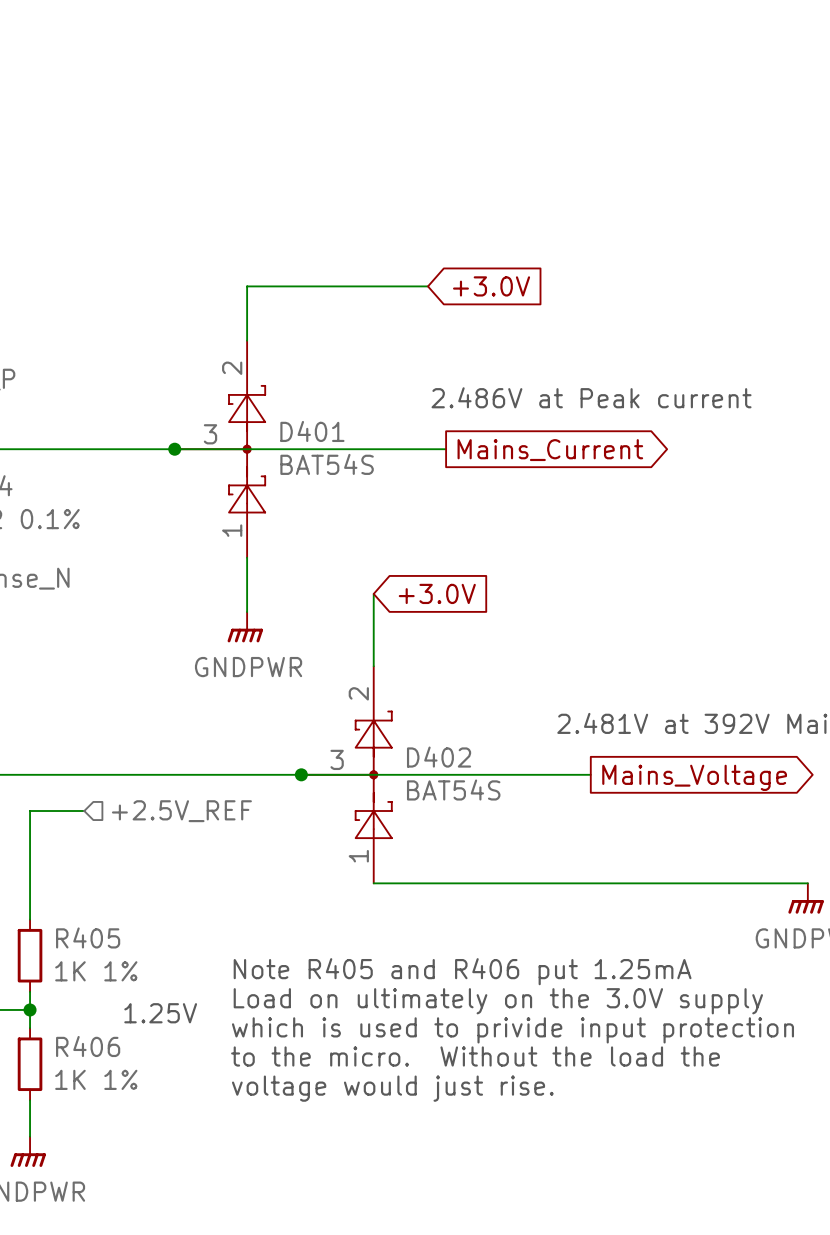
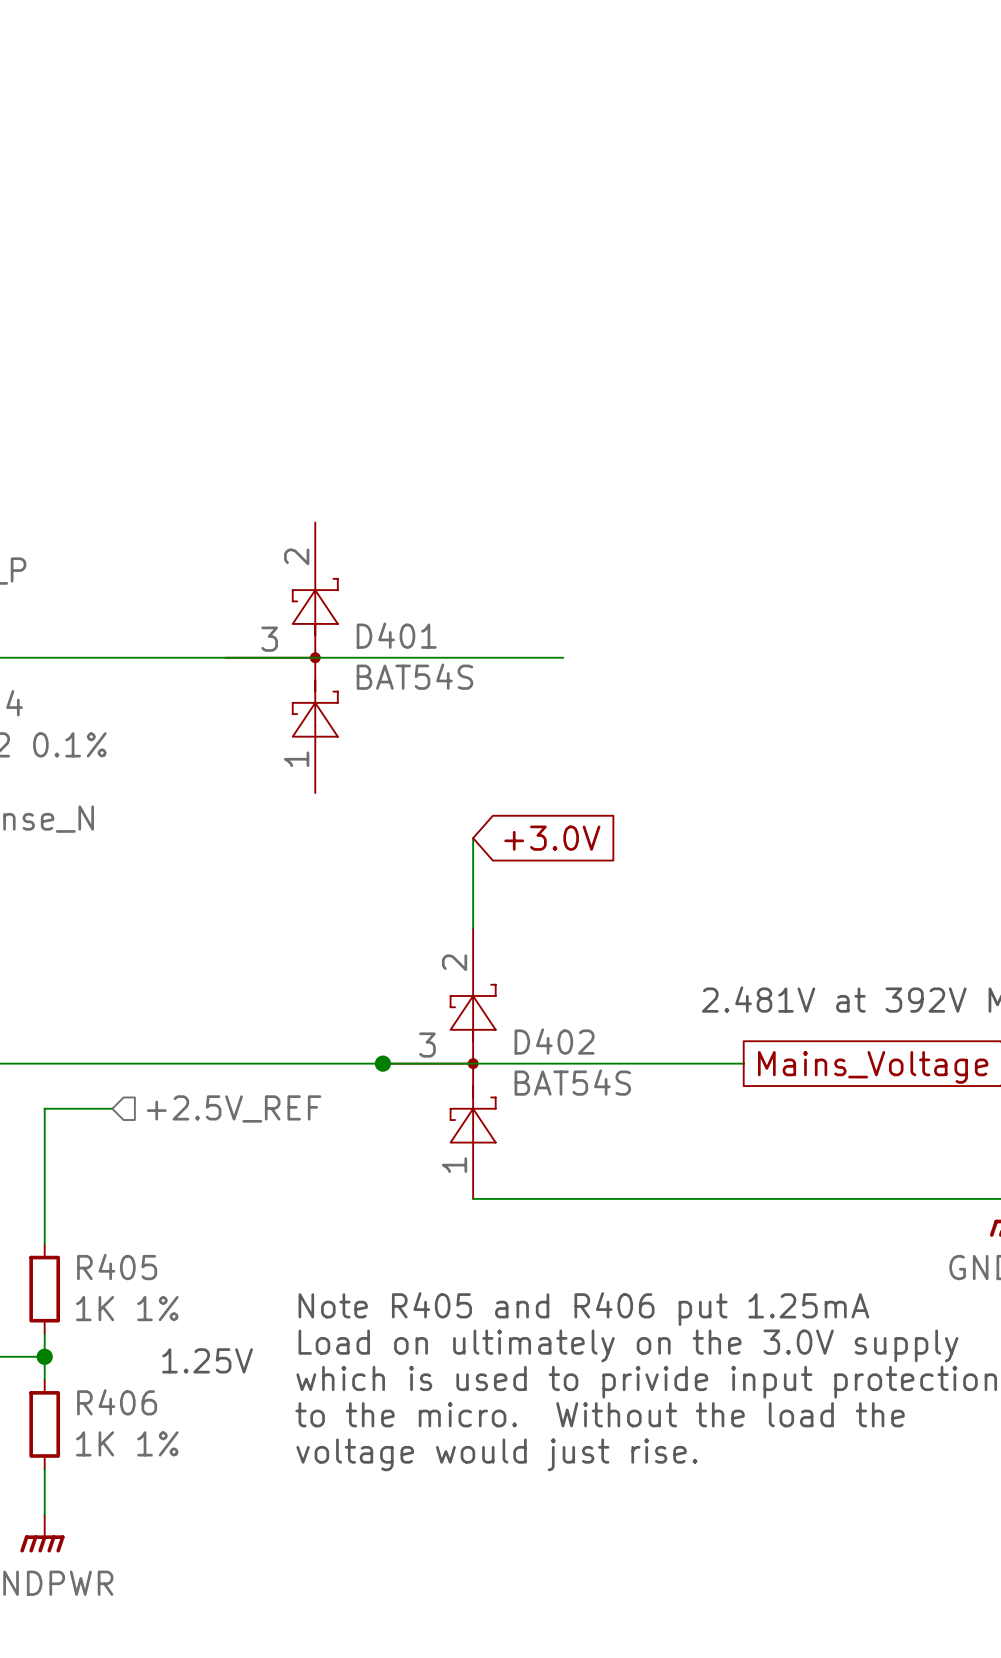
wire: (427, 286) (247, 286) (247, 340) -> none
global label: +3.0V (491, 286) -> none
text: 2.486V at Peak current (591, 397) -> none
junction: (174, 449) -> none
global label: Mains_Current (550, 450) -> none
wire: (247, 557) (247, 612) -> none
power symbol: GNDPWR (245, 627) -> none

